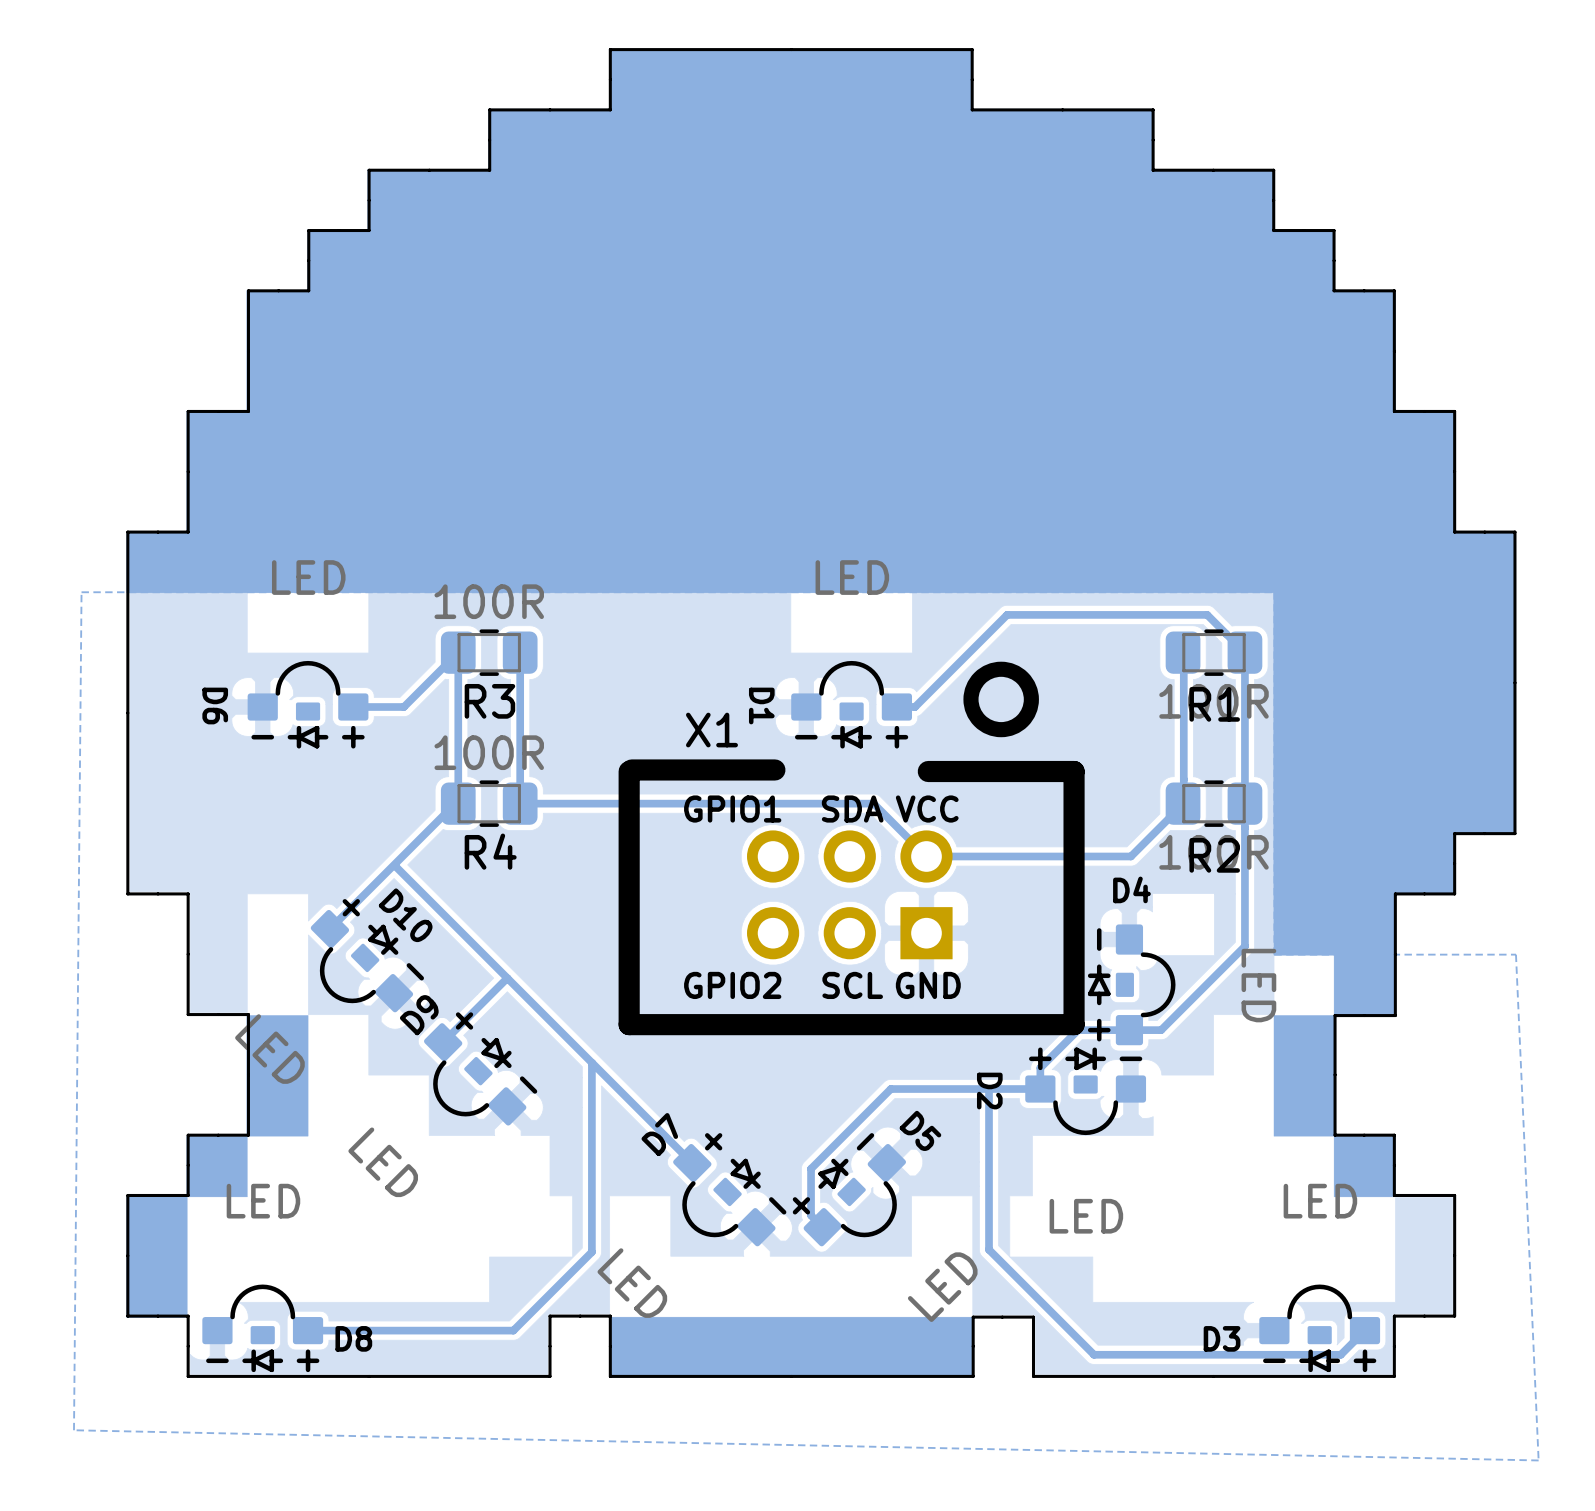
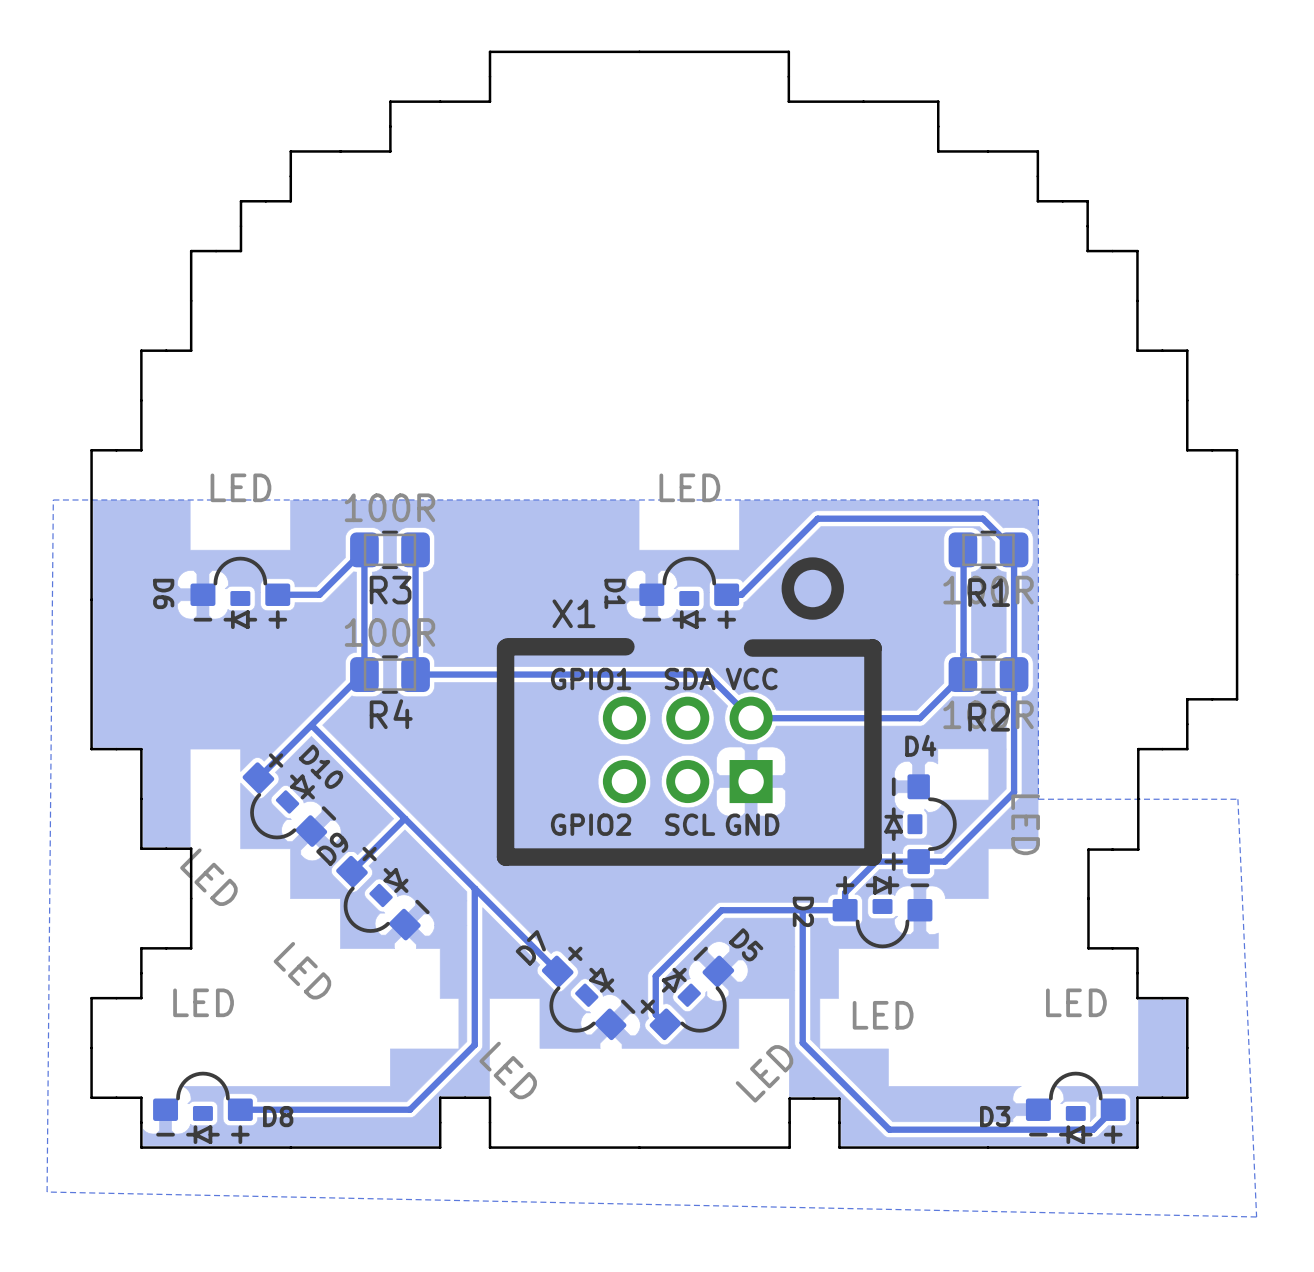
drawing: [126, 48, 1516, 1378] -> none

